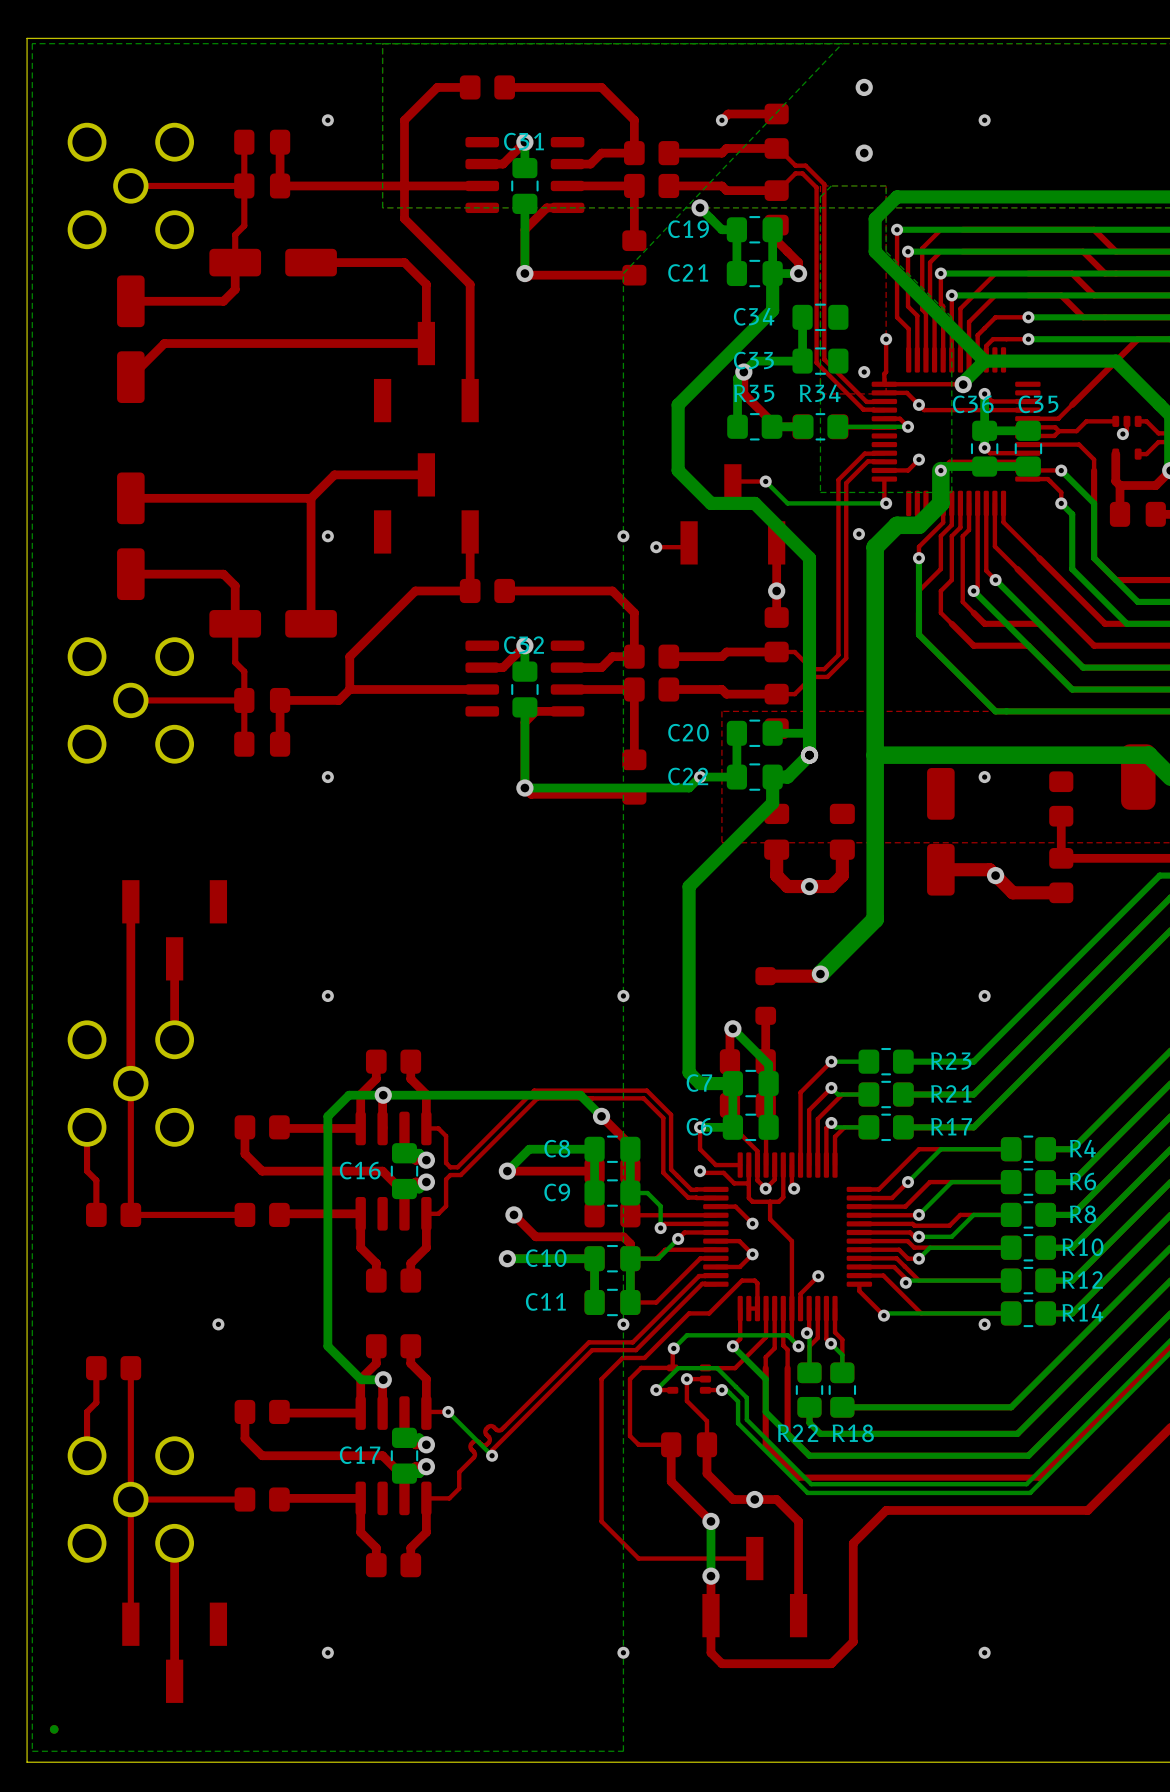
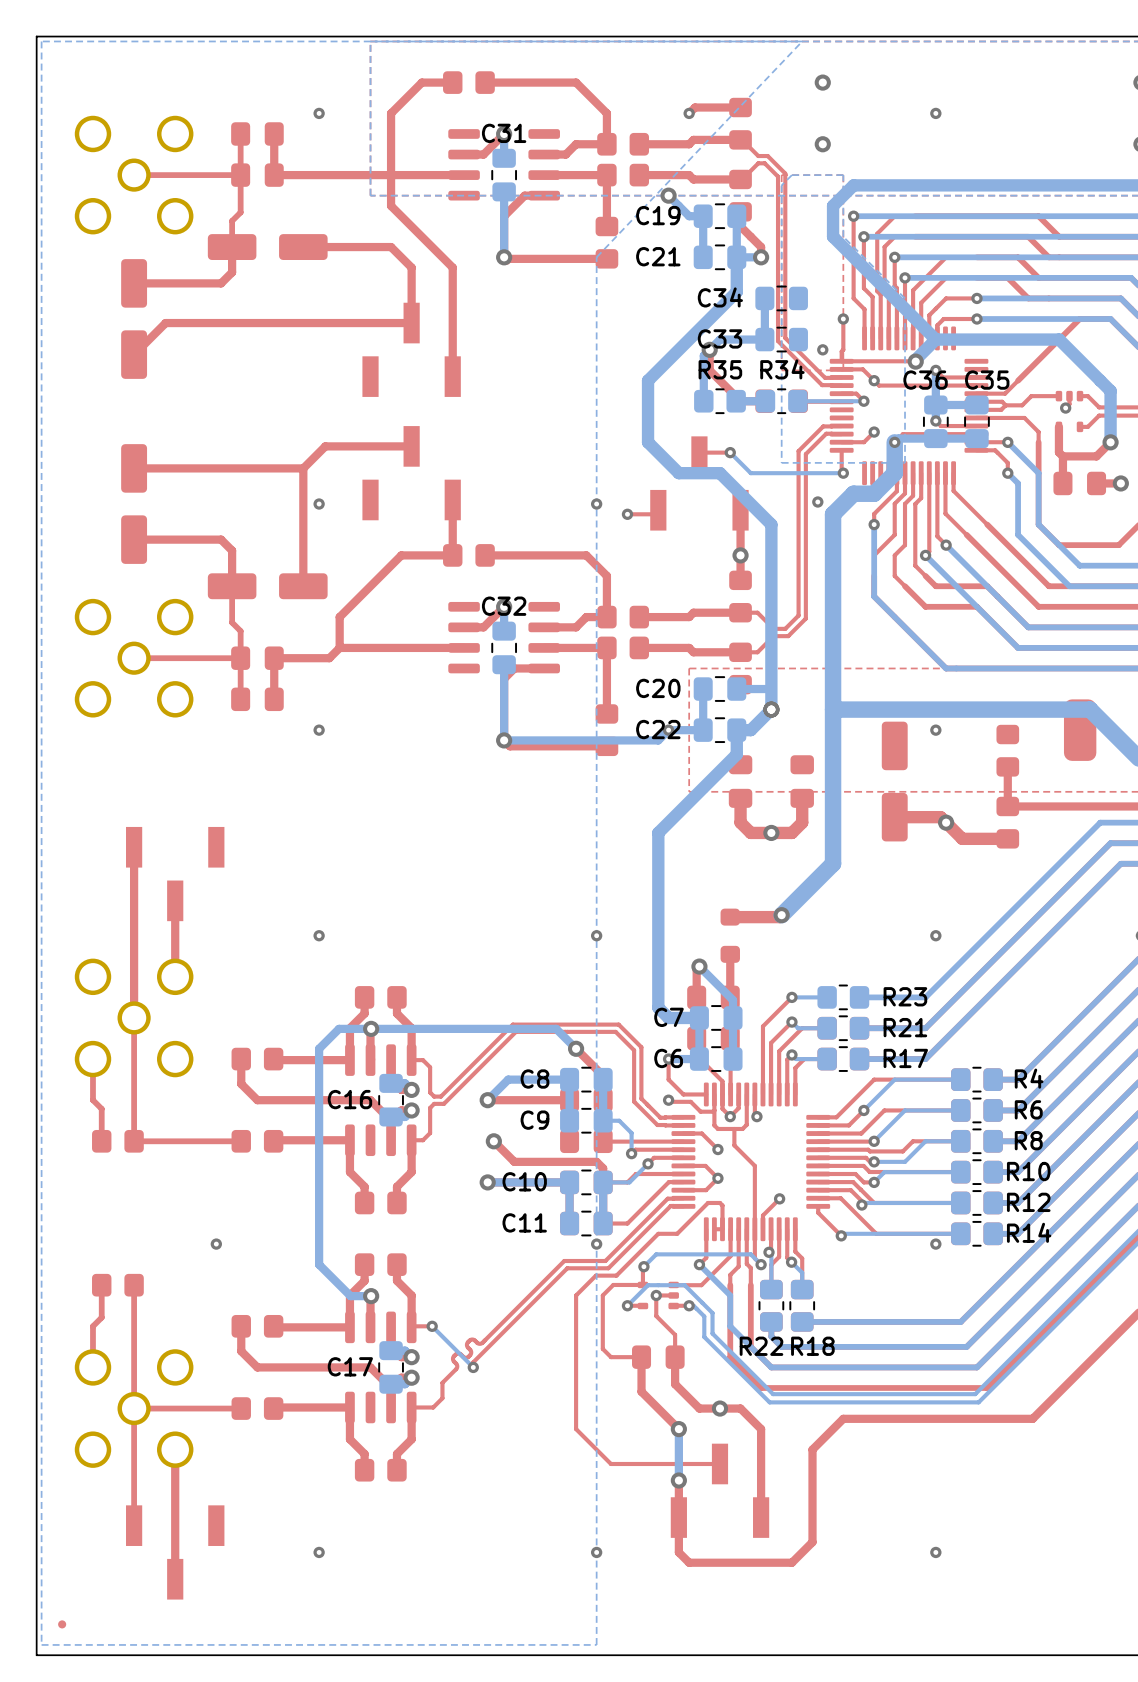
part: (54, 1729) -> none

